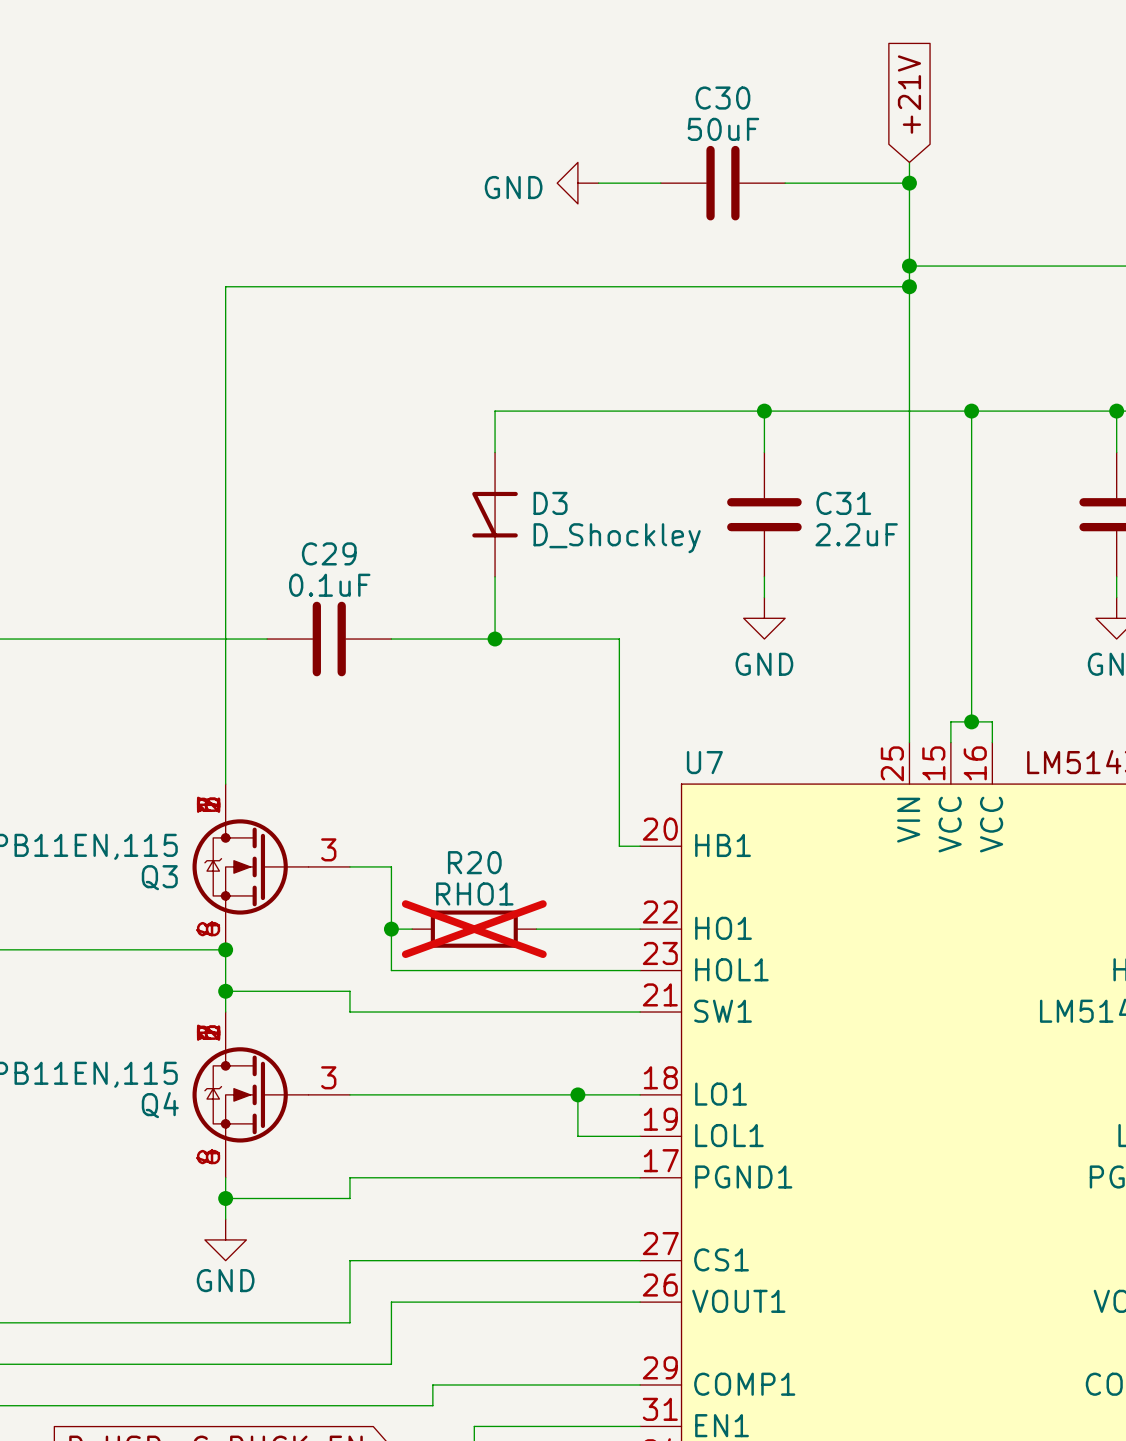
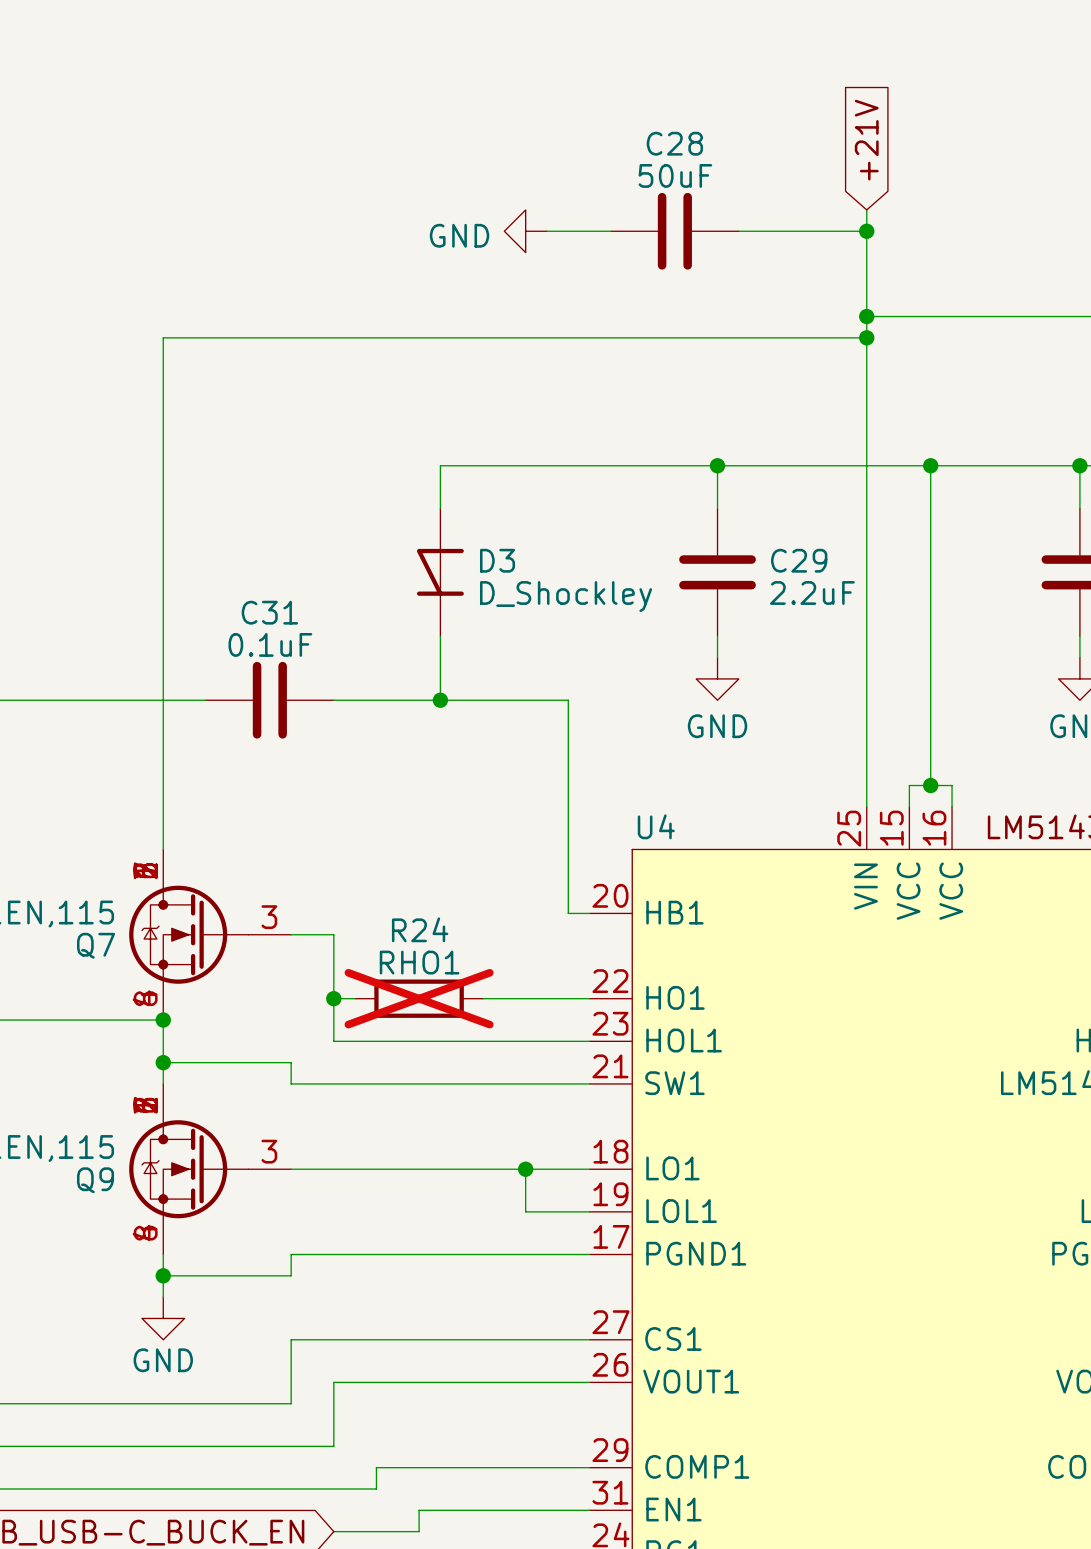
C30 name: C30 (722, 98) -> C28 (674, 143)
C31 name: C31 (843, 503) -> C29 (799, 560)
C29 name: C29 (329, 553) -> C31 (269, 612)
U7 name: U7 (704, 762) -> U4 (656, 826)
R20 name: R20 (474, 862) -> R24 (420, 929)
Q3 name: Q3 (159, 877) -> Q7 (96, 945)
Q4 name: Q4 (160, 1105) -> Q9 (95, 1180)

